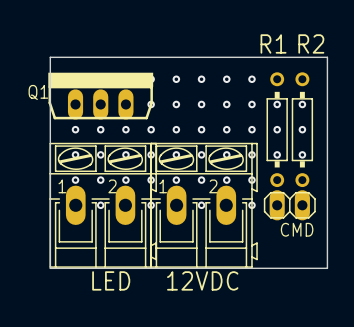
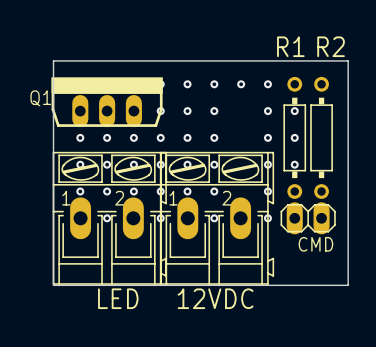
via: (226, 104) -> none
via: (302, 104) -> none
via: (226, 129) -> none
via: (302, 129) -> none
via: (226, 154) -> none
via: (302, 154) -> none
via: (226, 180) -> none

